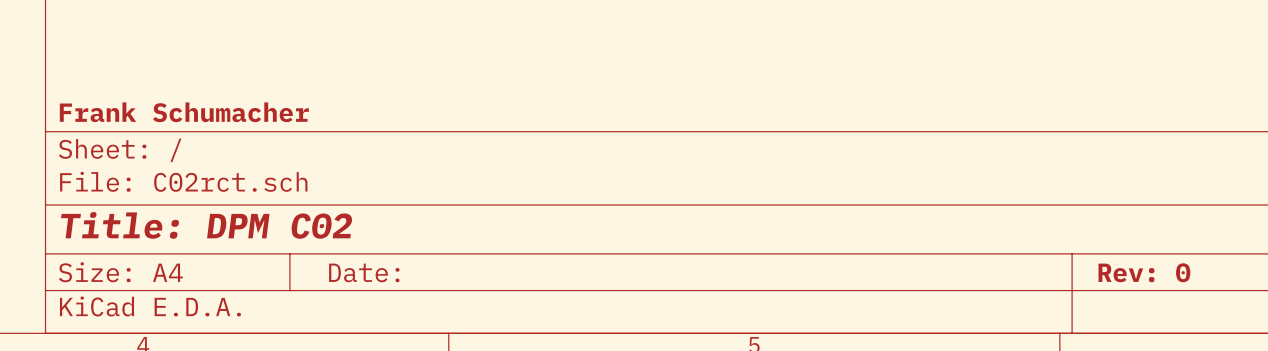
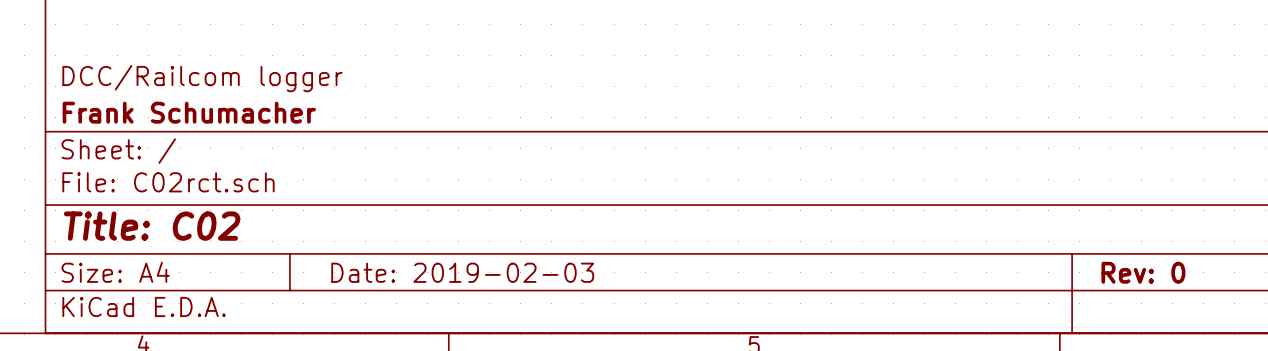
title block: none -> DCC/Railcom logger (202, 78)
title block: Title: DPM C02 (206, 225) -> Title: C02 (152, 226)
title block: Date: (364, 272) -> Date: 2019-02-03 (462, 272)

